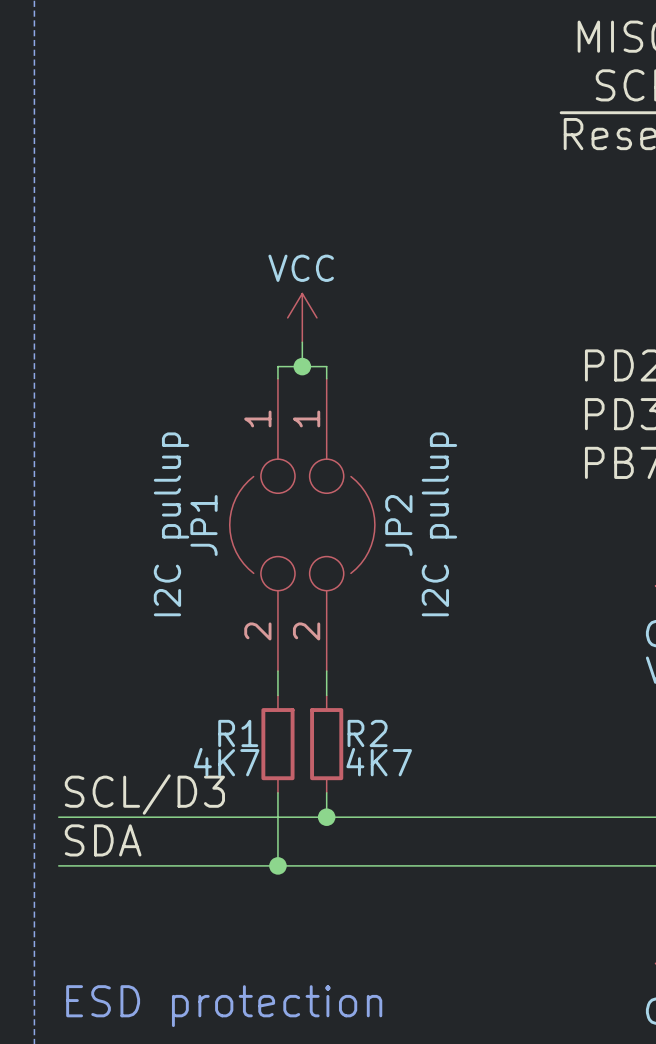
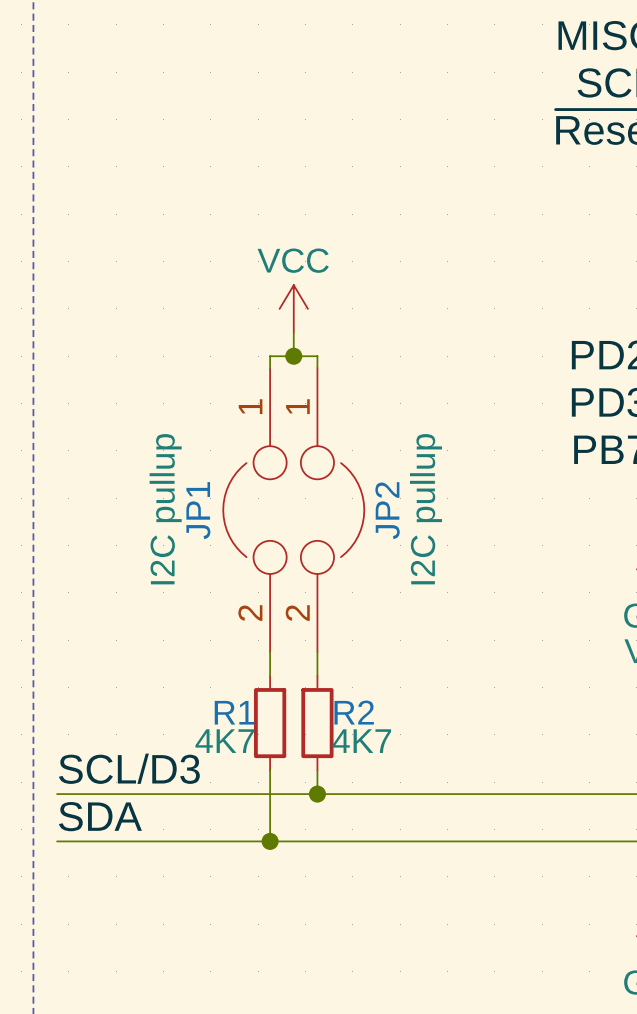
text: ESD protection (224, 1006) -> none

